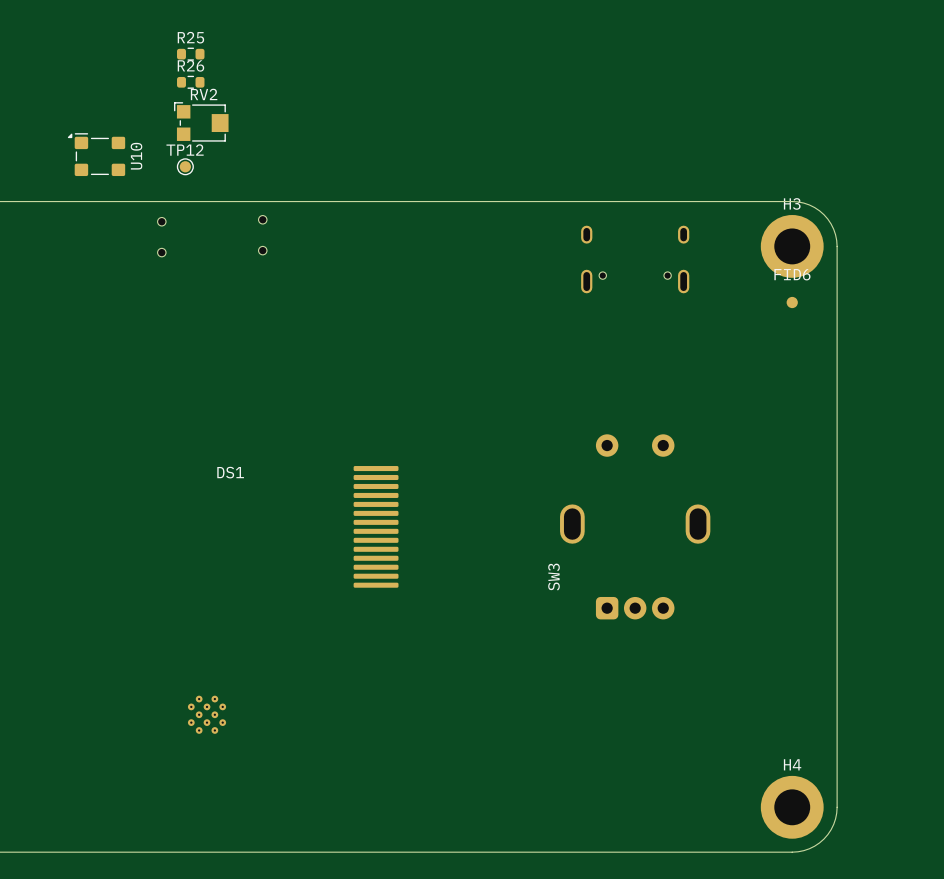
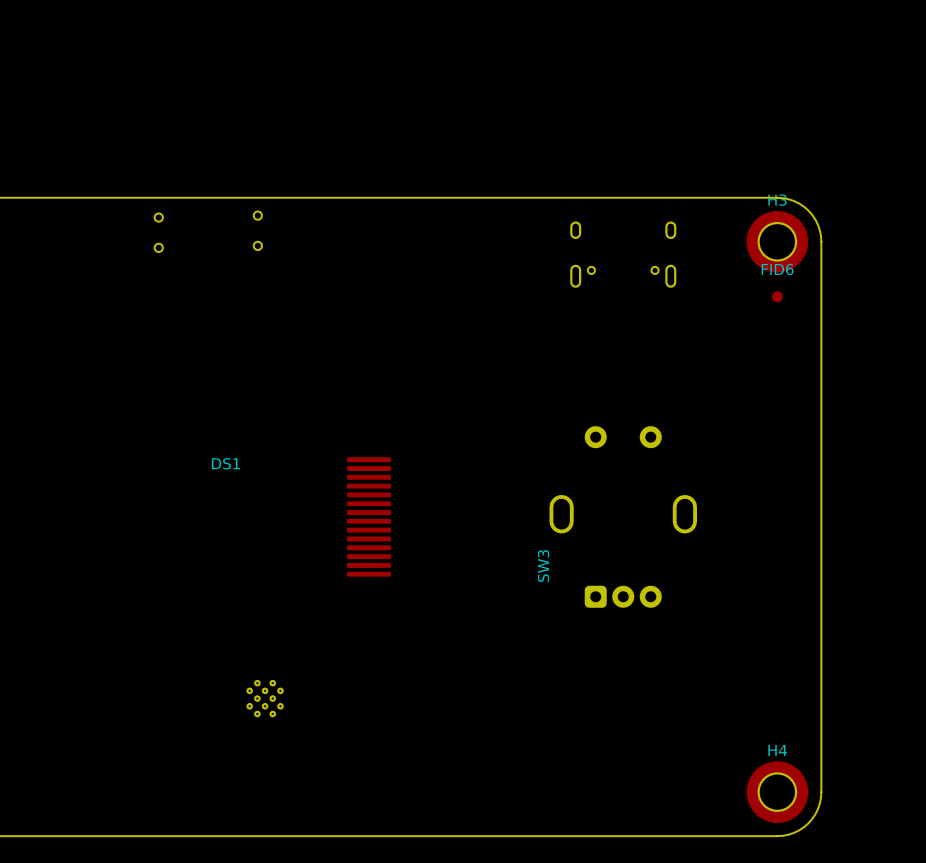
R25: (190, 54) -> none
R26: (190, 82) -> none
RV2: (201, 121) -> none
U10: (96, 154) -> none
TP12: (185, 166) -> none
part position: (207, 714) -> (265, 698)

